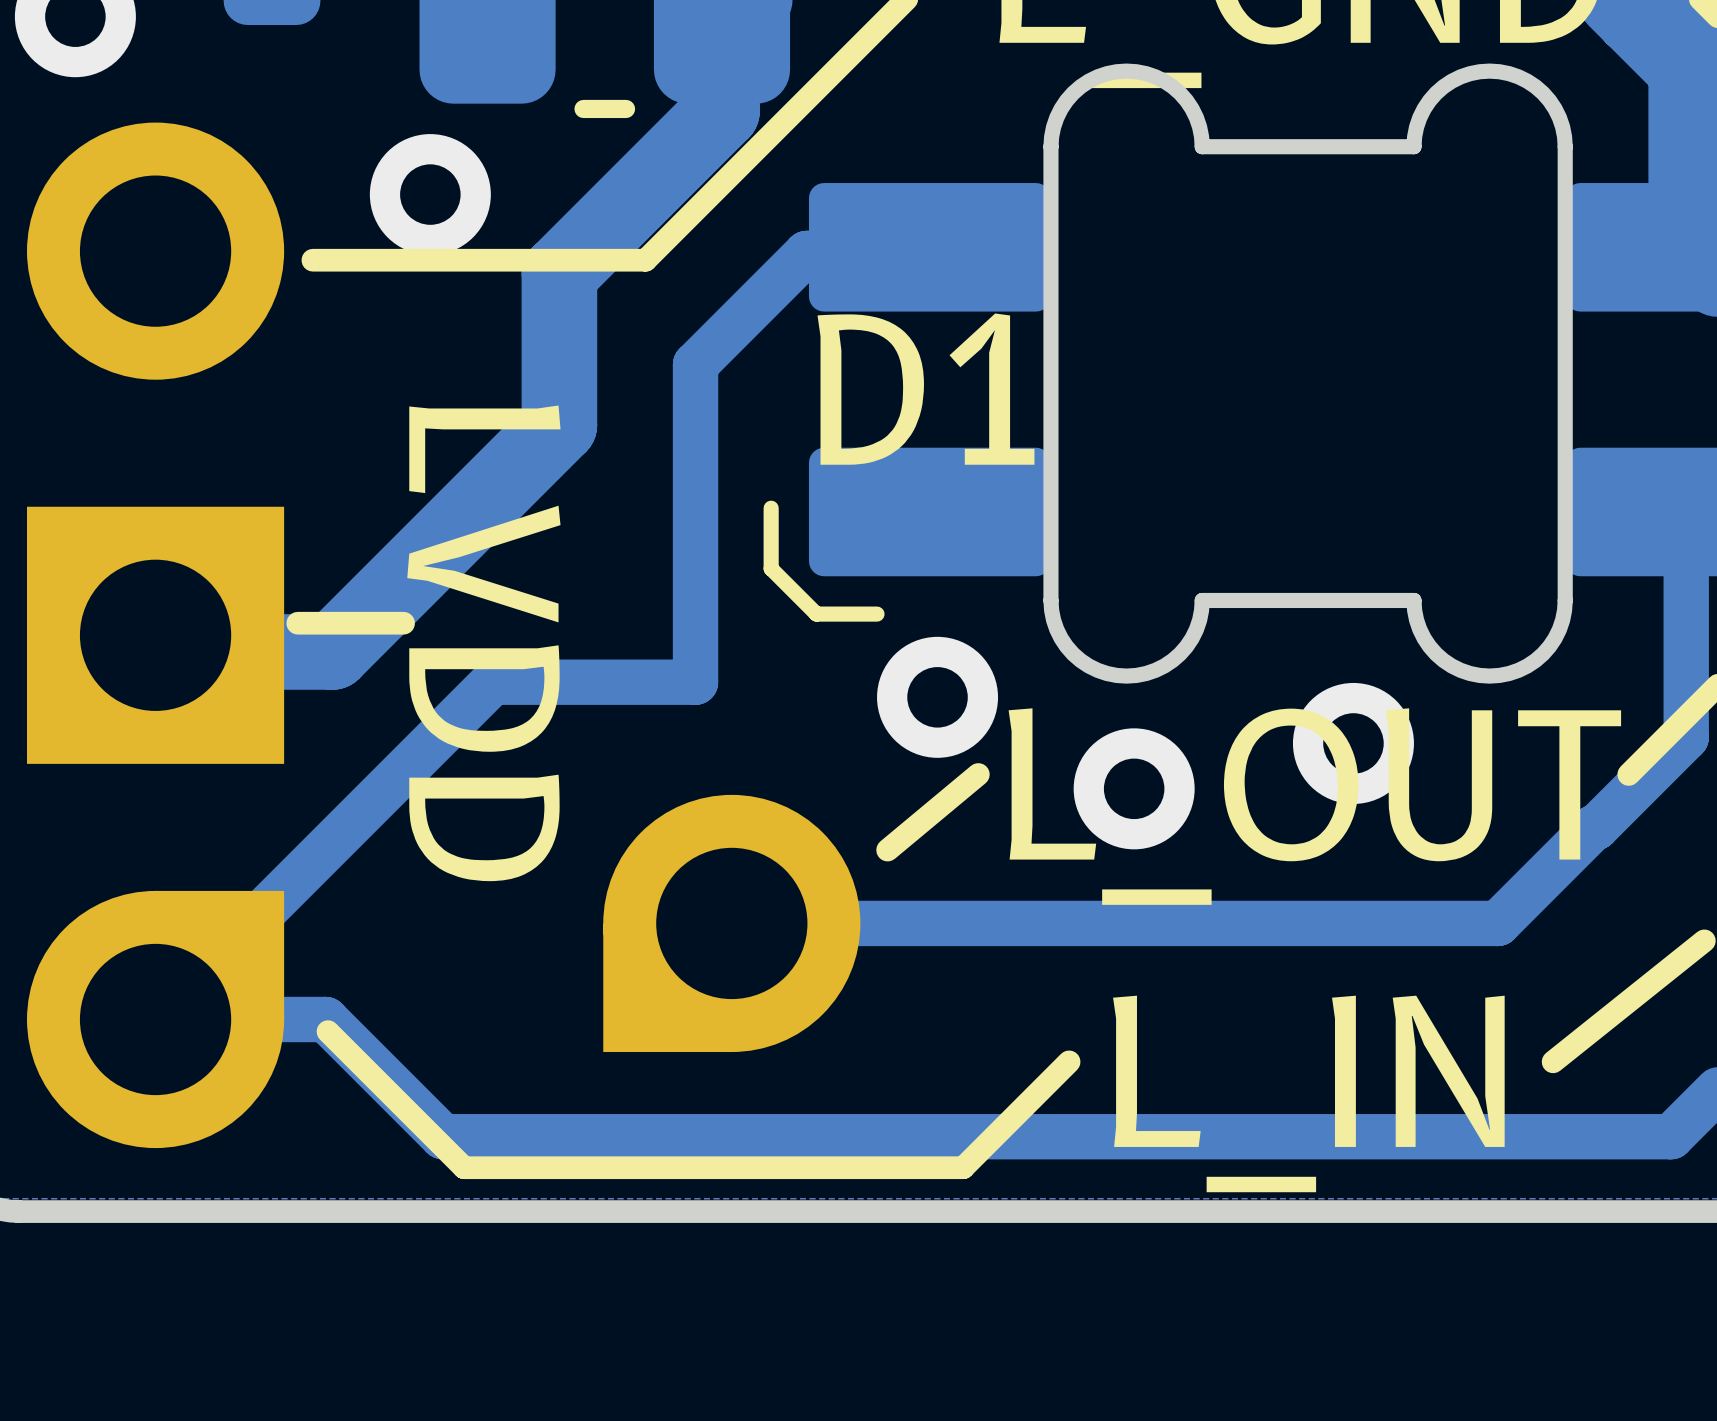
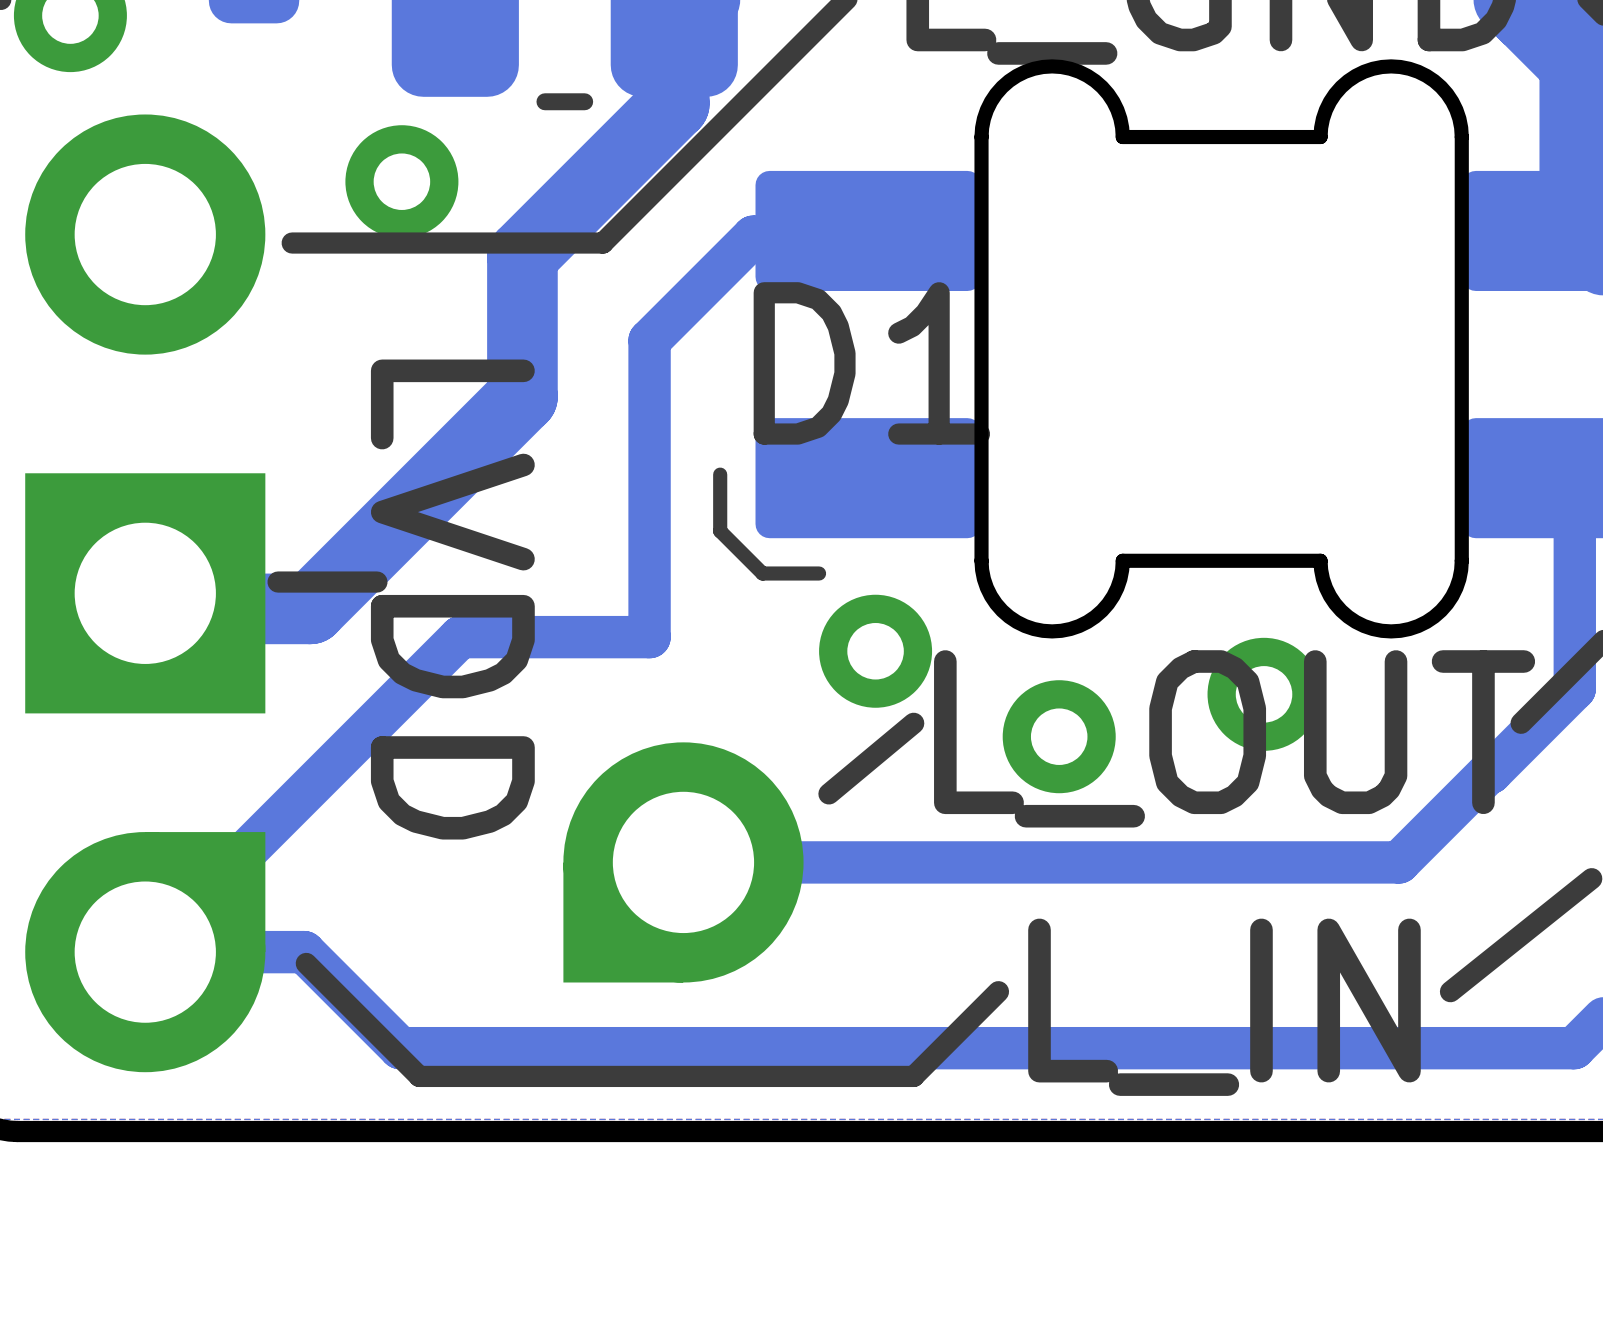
bottom track: (1685, 1122) (1671, 1136) (442, 1136) (428, 1122) -> (1574, 1048) (400, 1048)
line: (978, 1152) (963, 1167) (464, 1167) (448, 1152) -> (913, 1076) (419, 1076)

